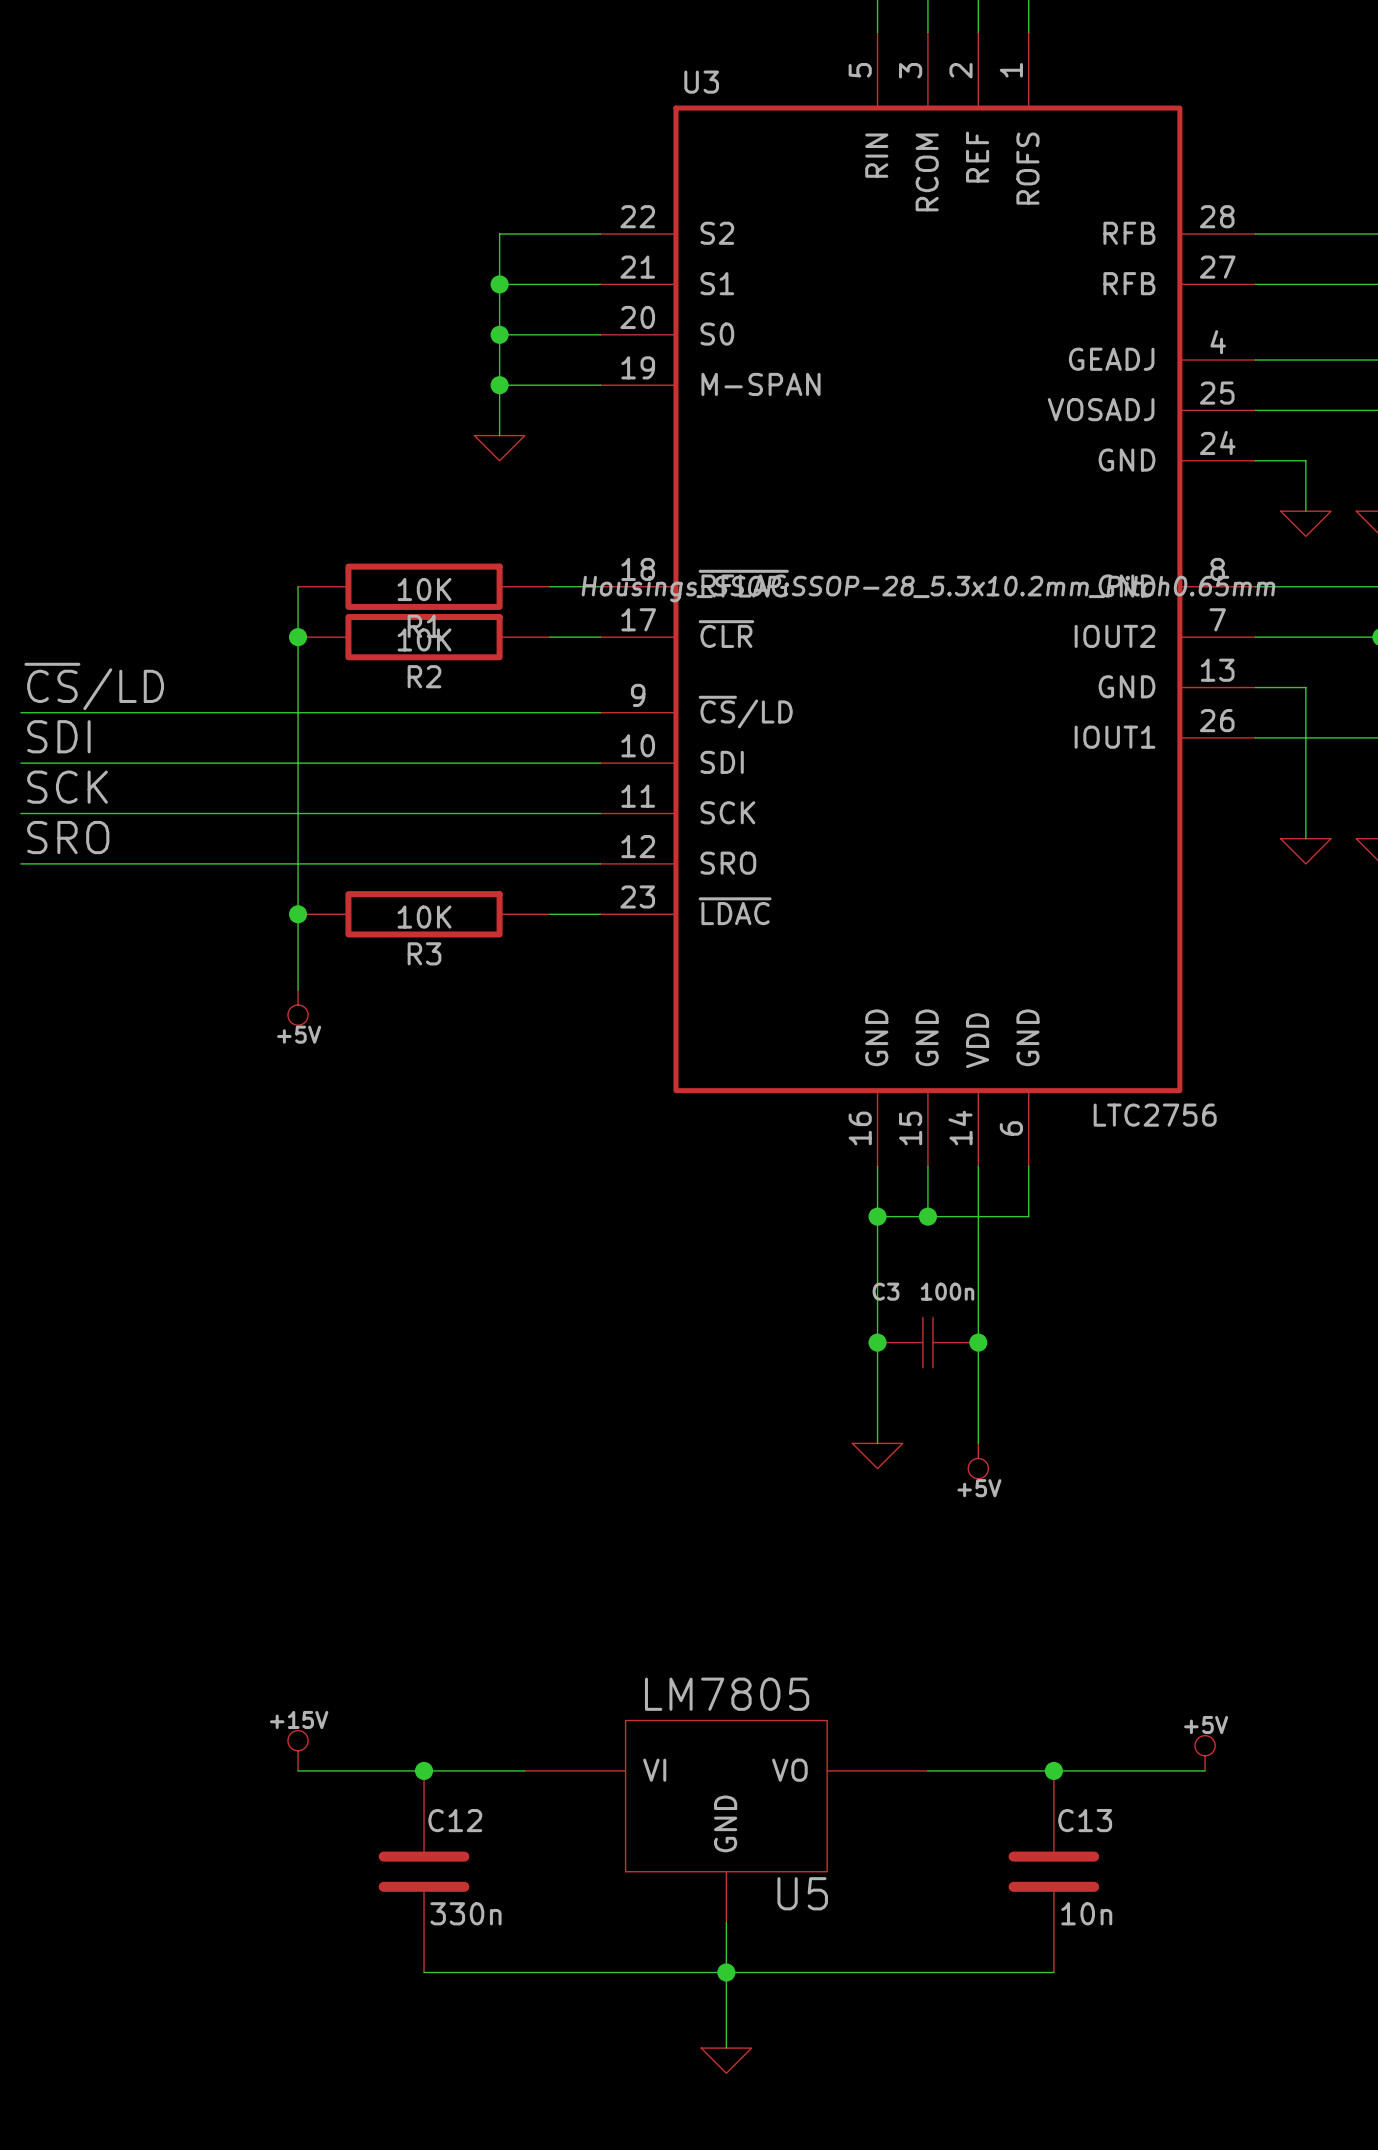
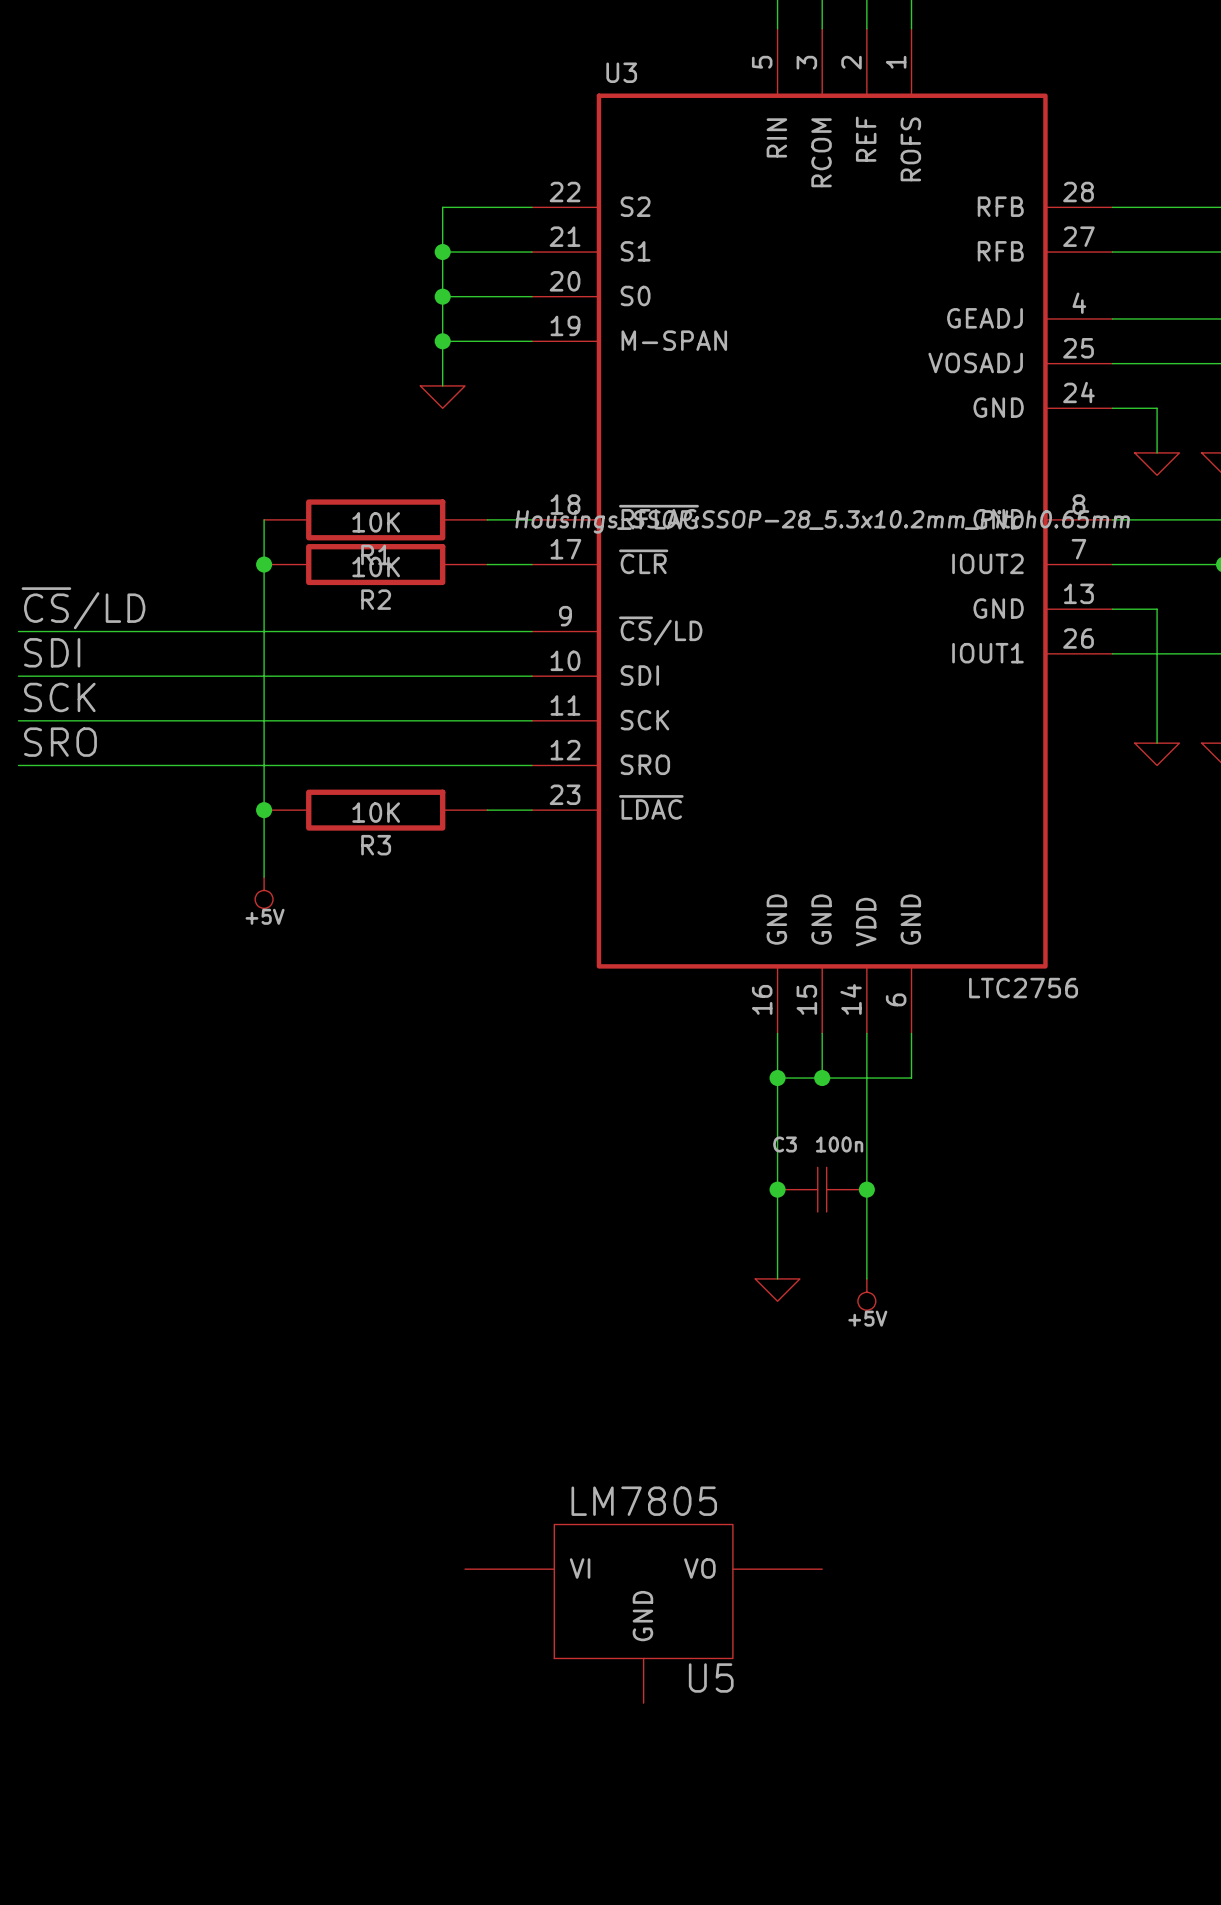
power symbol: +15V (298, 1750) -> none
power symbol: +5V (1205, 1753) -> none
wire: (298, 1770) (524, 1770) -> none
junction: (424, 1770) -> none
wire: (927, 1770) (1205, 1770) -> none
junction: (1053, 1770) -> none
C12: 330n (424, 1871) -> none
C13: 10n (1053, 1871) -> none
wire: (726, 1922) (726, 2048) -> none
wire: (424, 1972) (1053, 1972) -> none
junction: (726, 1972) -> none
power symbol: (726, 2060) -> none

